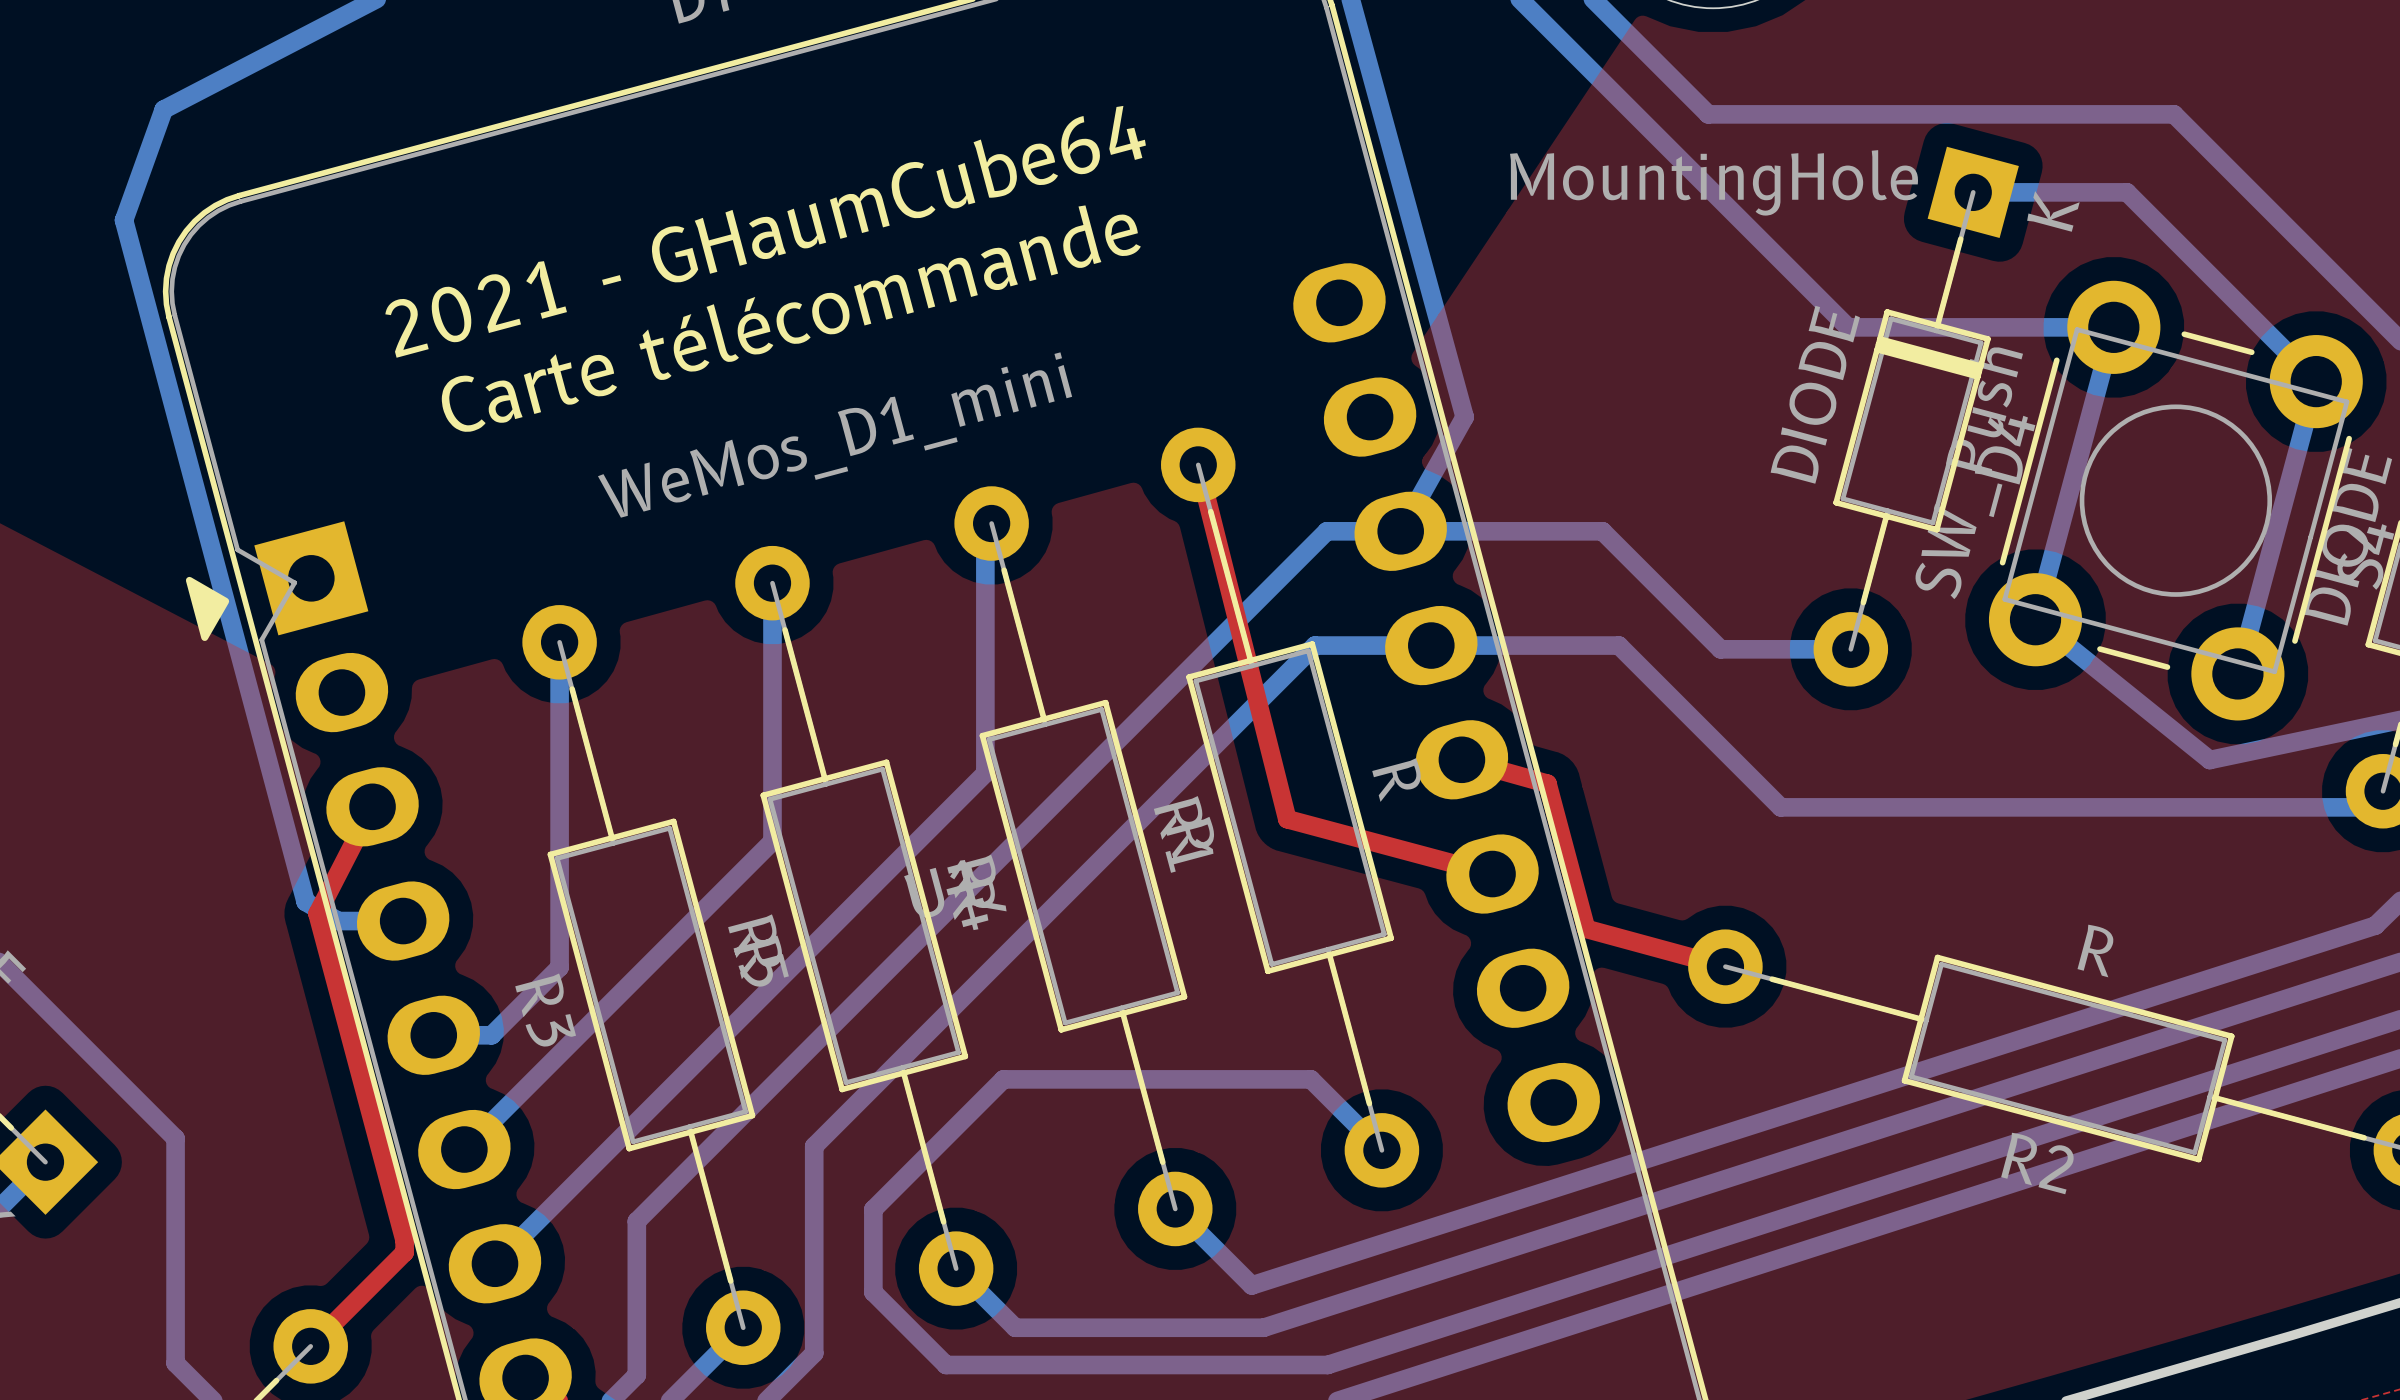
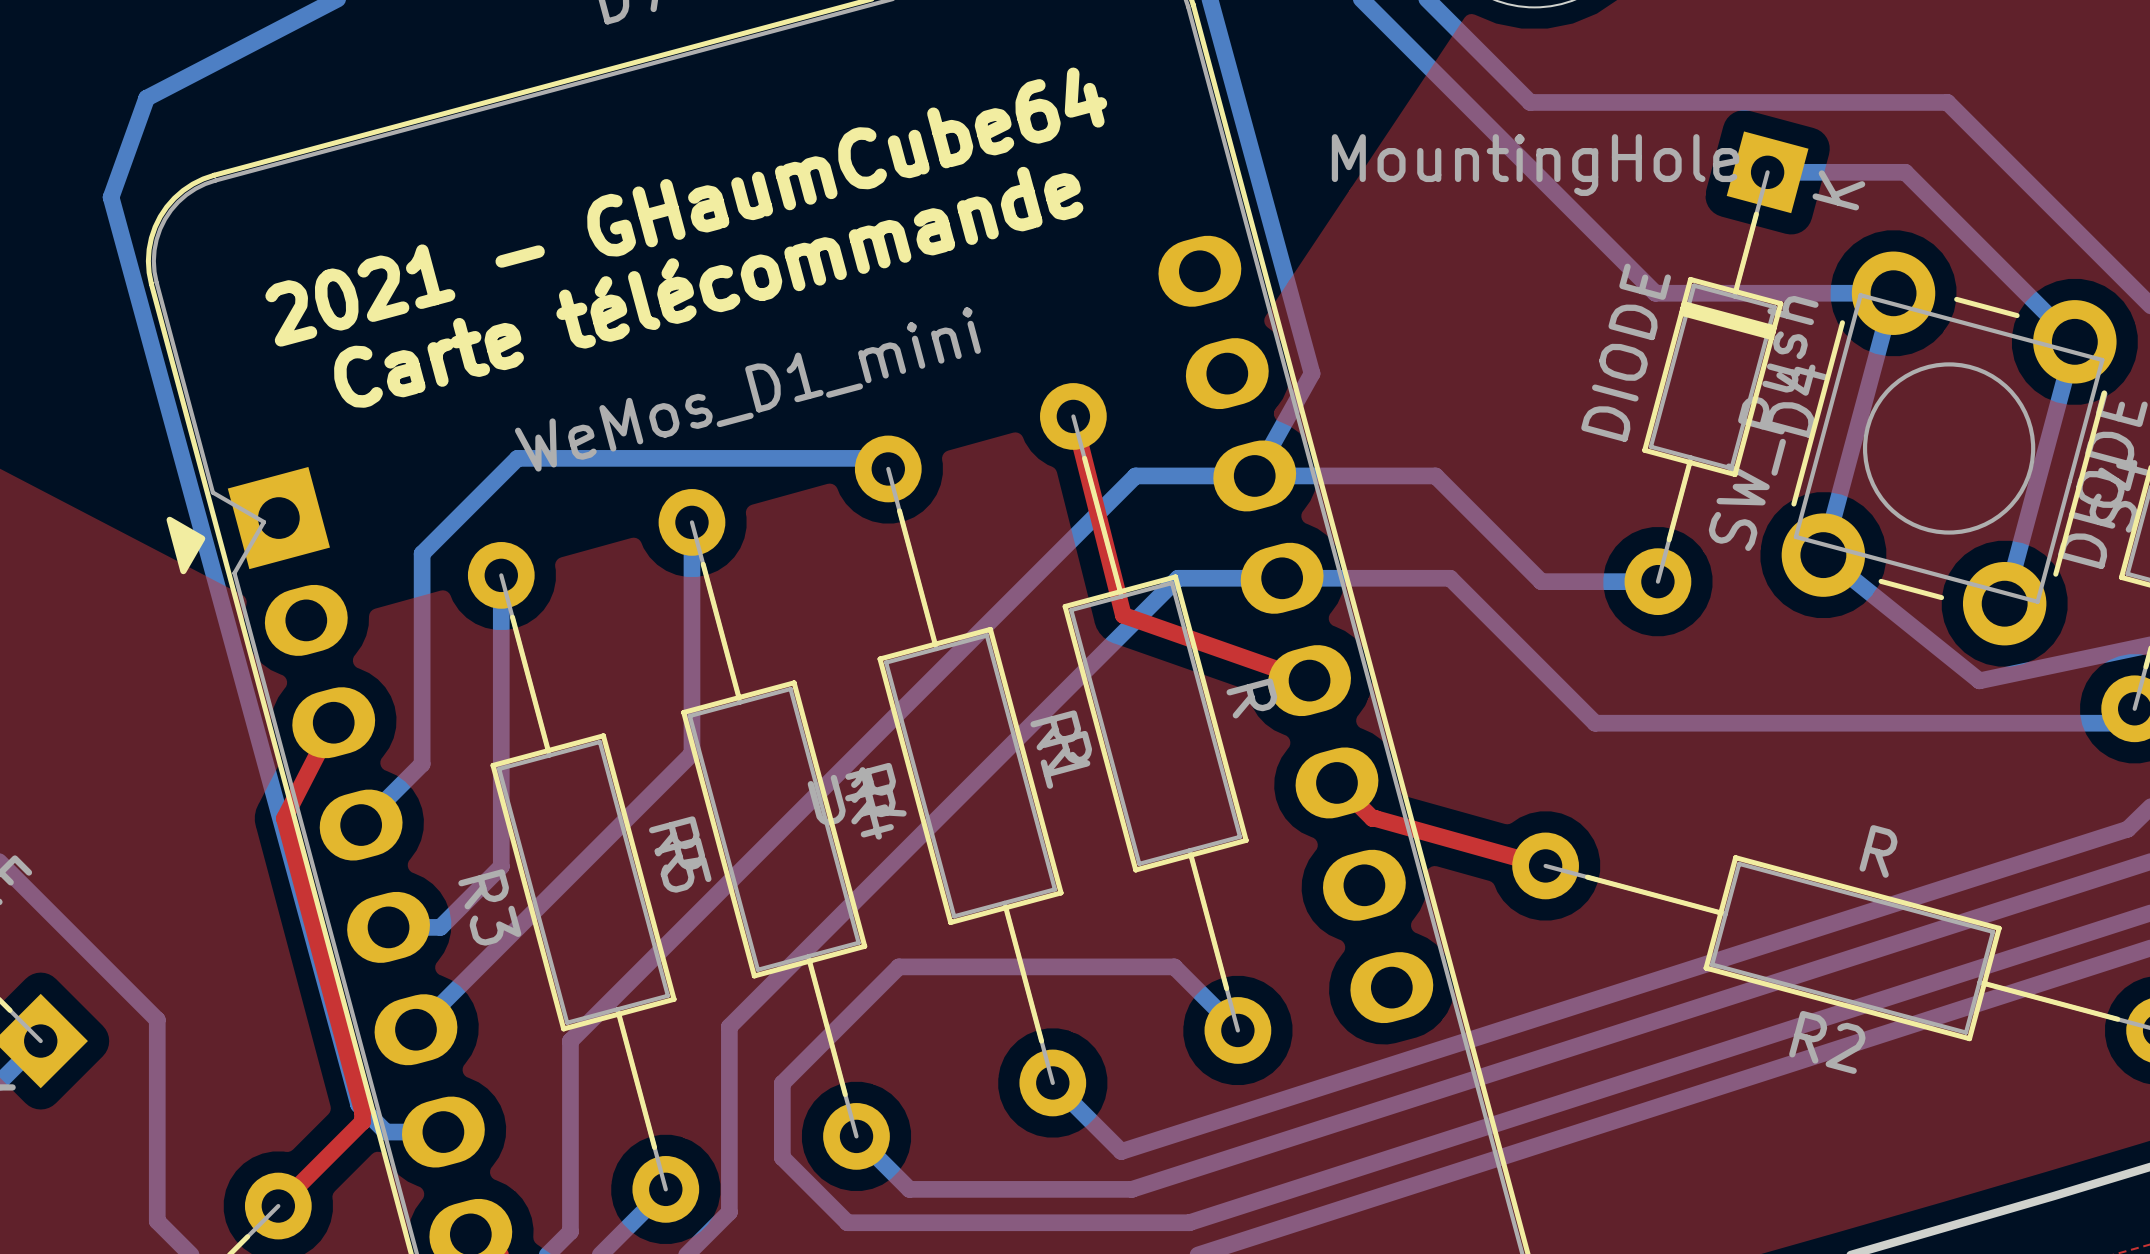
bottom track: (124, 220) (305, 901) (338, 921) (403, 921) (403, 903) -> (111, 197) (358, 1104) (386, 1132) (443, 1132)
bottom track: none -> (888, 468) (877, 458) (517, 458) (422, 553) (422, 764) (361, 825)
bottom track: (985, 524) (985, 773) (494, 1263) -> none
bottom track: (1326, 531) (636, 1221) -> (1188, 475) (1135, 475) (570, 1041) (570, 1094)
top track: (1254, 686) (1287, 819) (1492, 874) -> (1123, 615) (1309, 680)
top track: (1461, 759) (1547, 783) (1586, 928) (1725, 966) -> (1336, 782) (1372, 818) (1545, 865)

